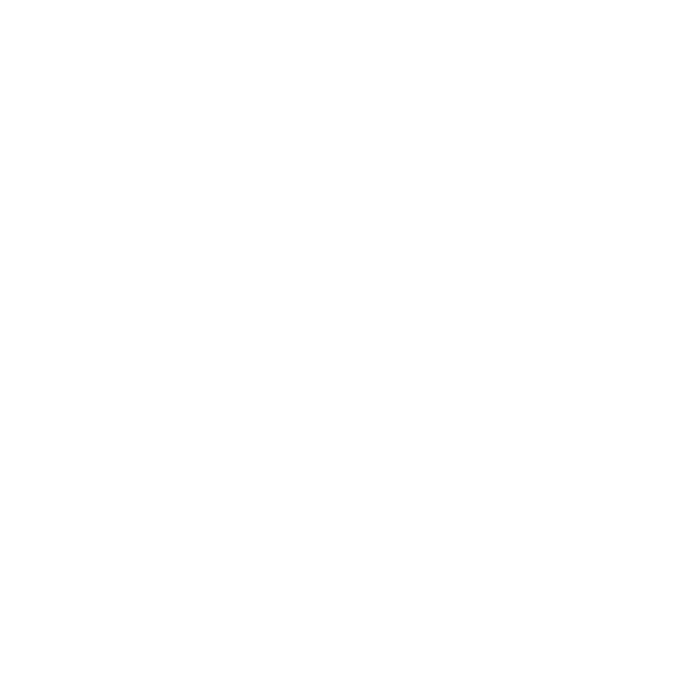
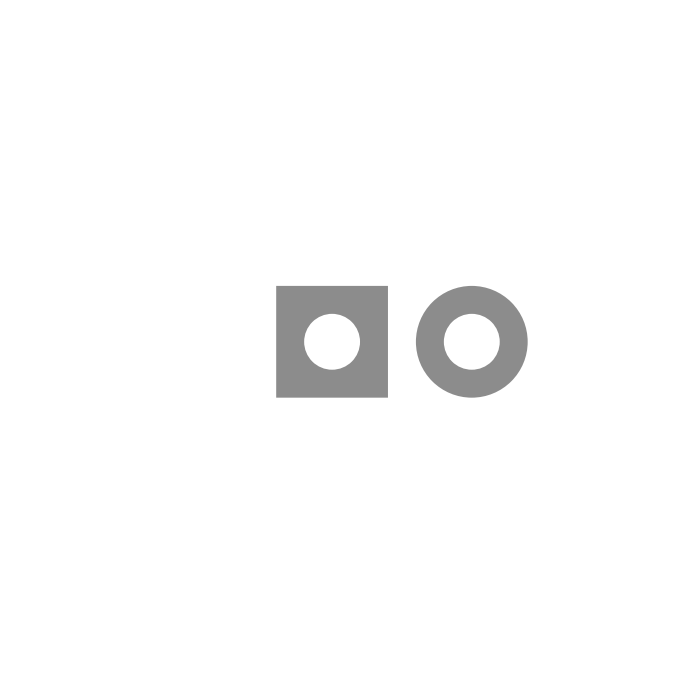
part: none -> (401, 341)

